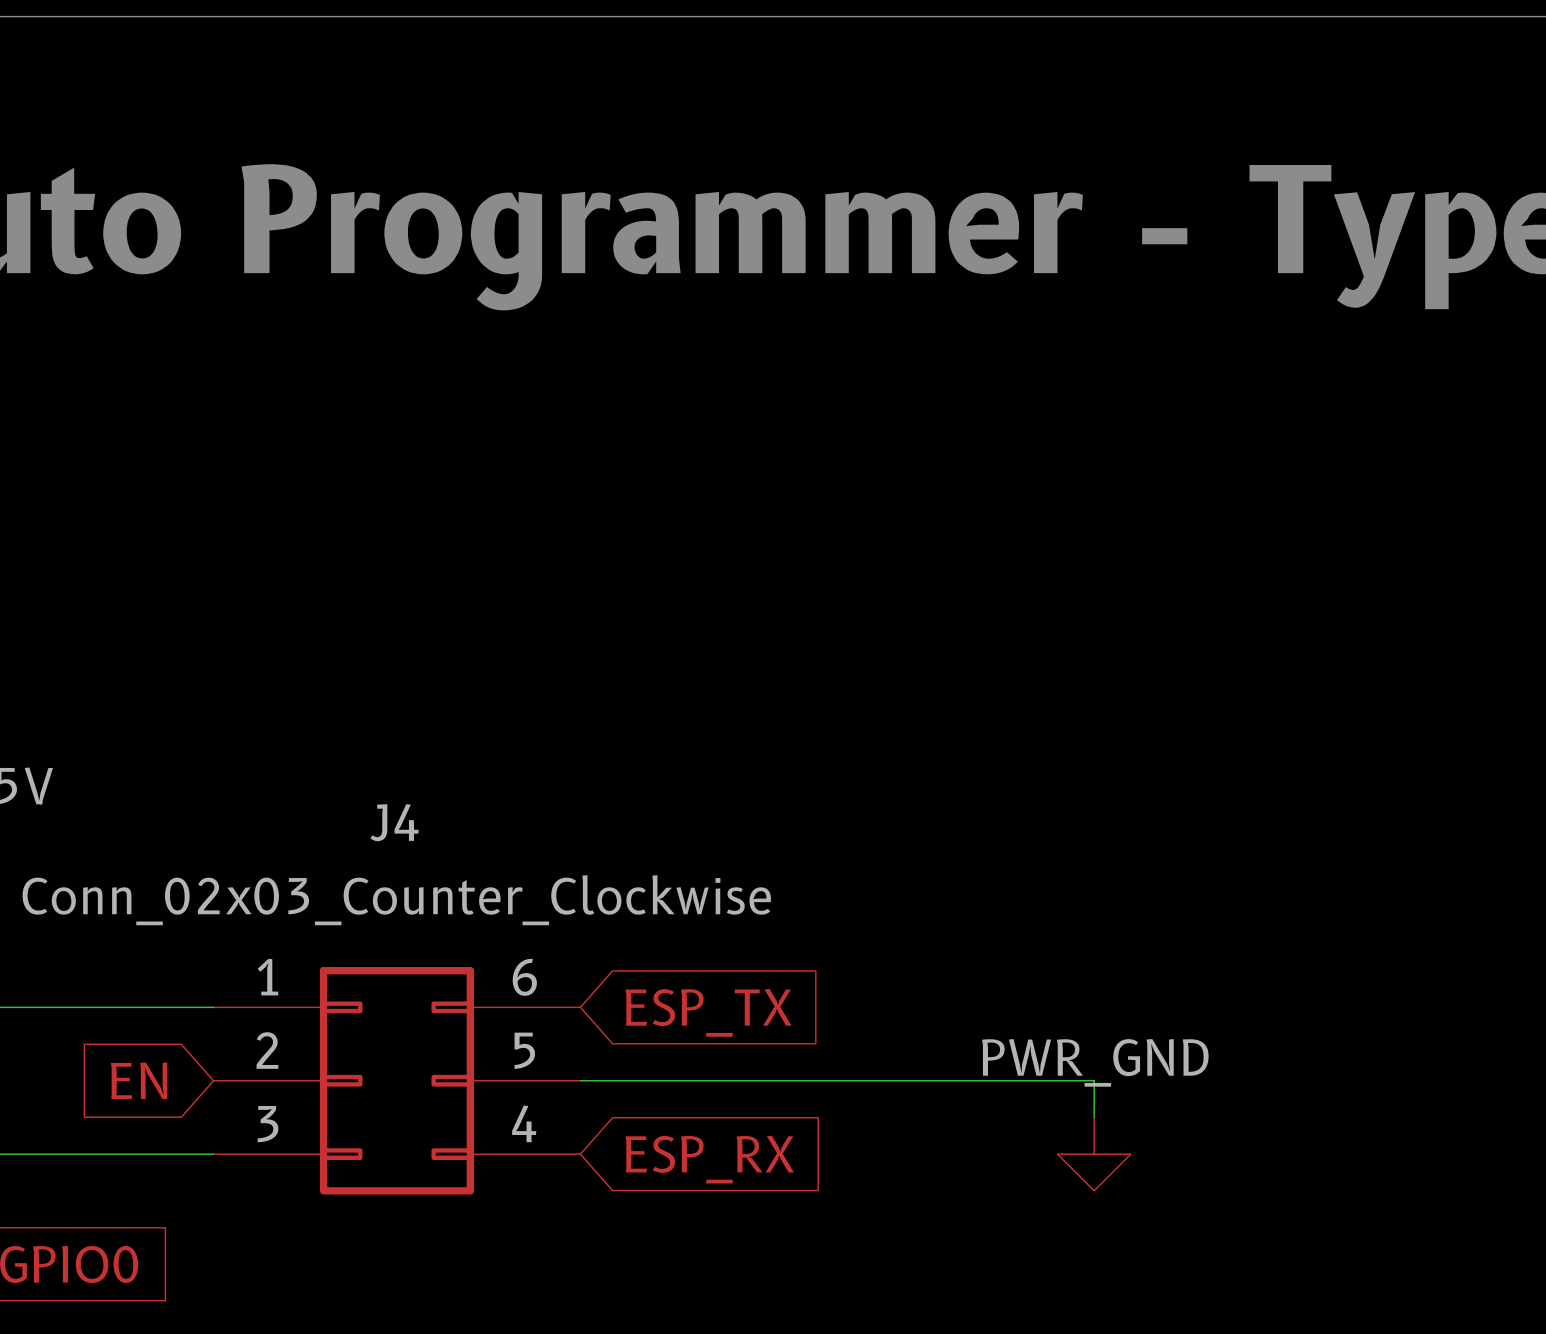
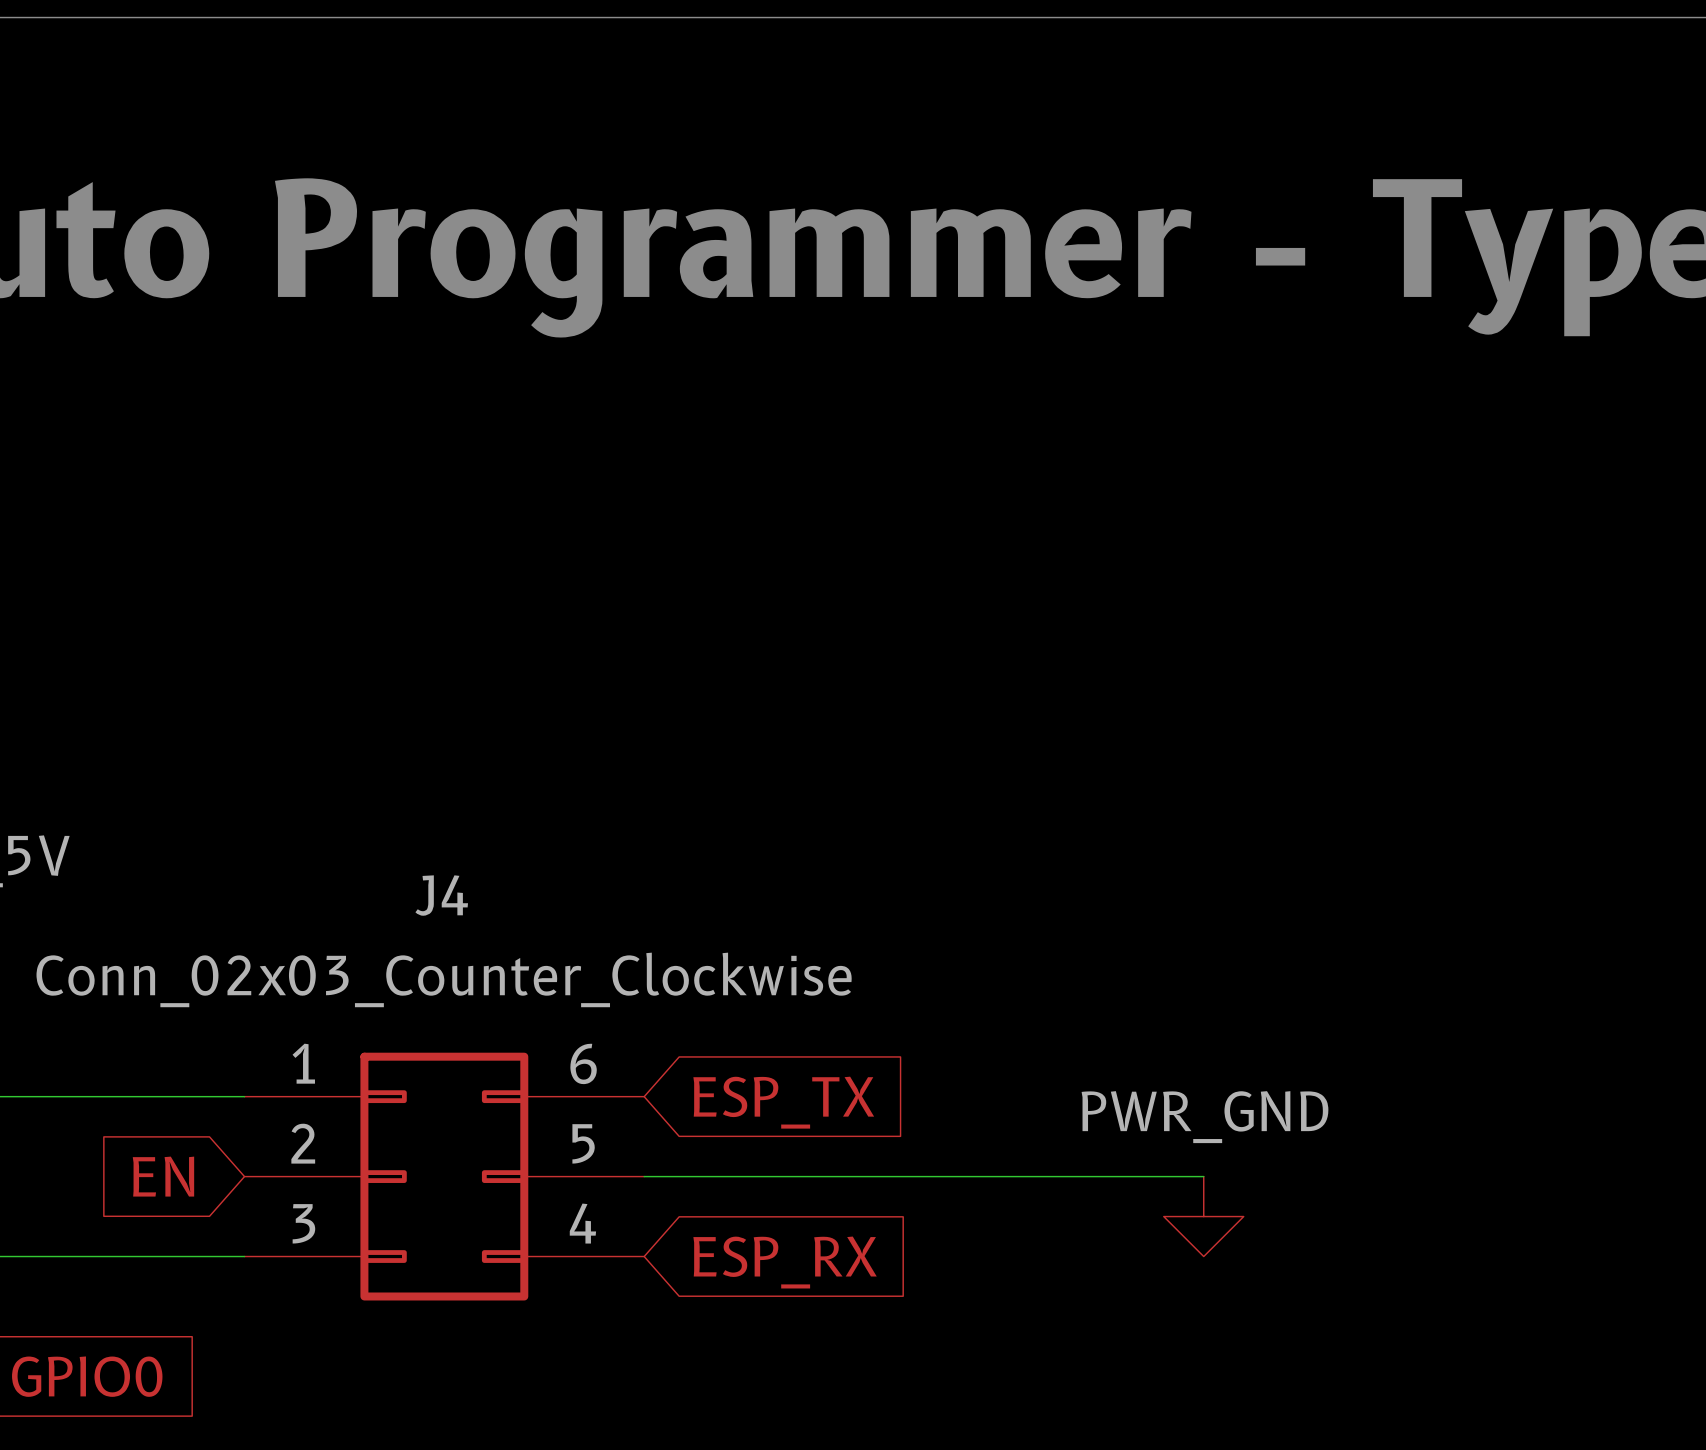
power symbol position: PWR_GND (1094, 1154) -> PWR_GND (1203, 1216)

